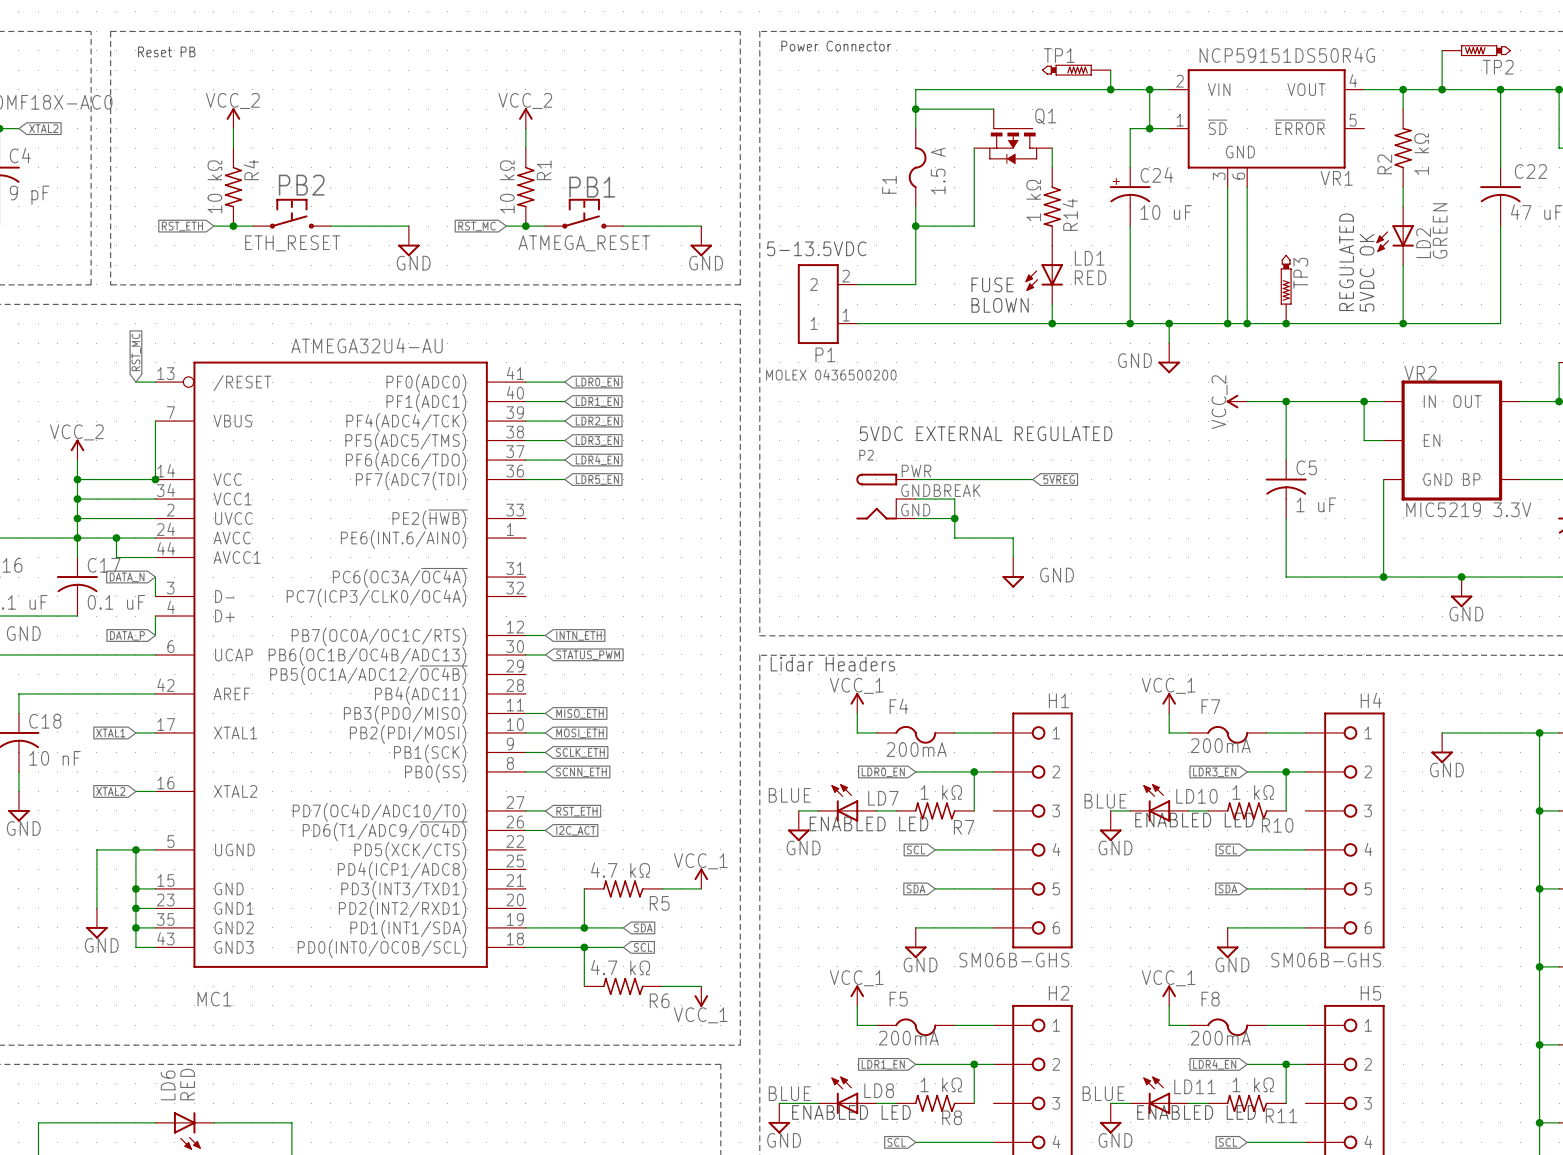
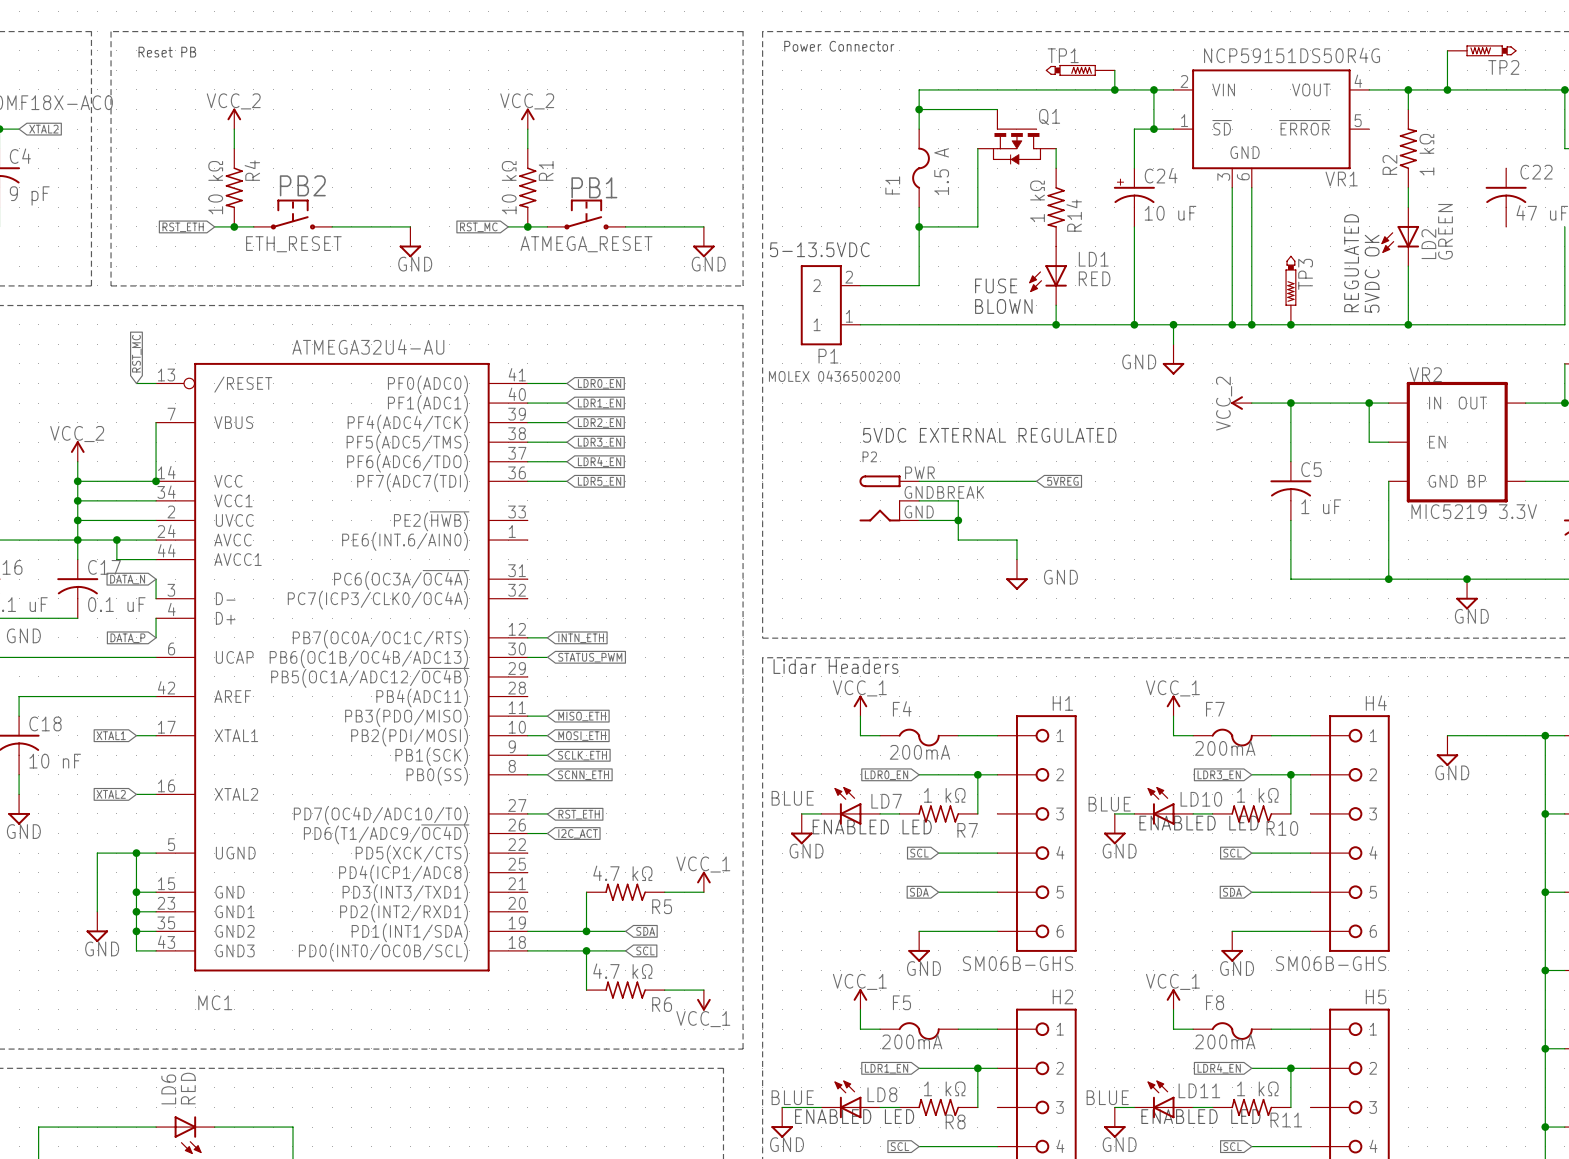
wire: (1500, 89) (1500, 167) -> none
junction: (1500, 89) -> none
wire: (1500, 226) (1500, 323) -> (1564, 226) (1564, 324) (1506, 324)

